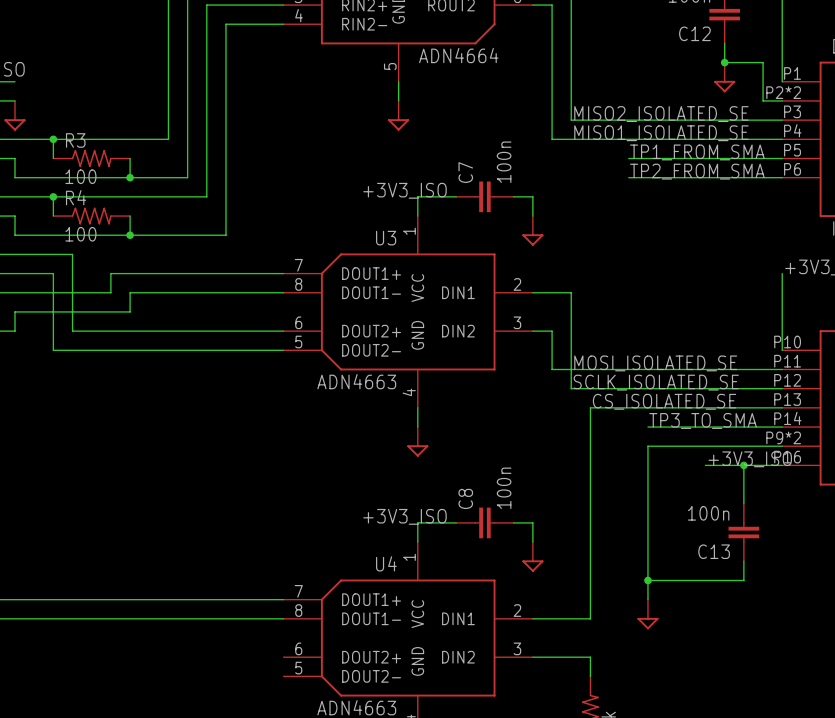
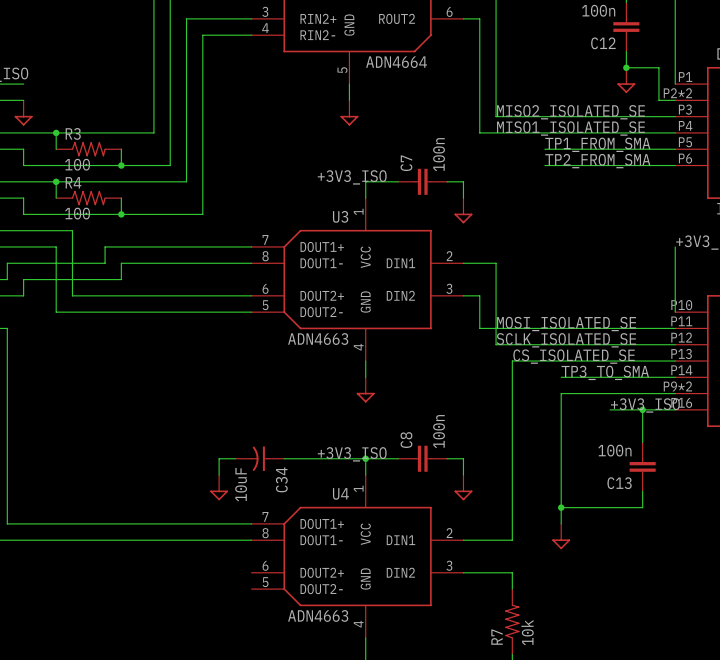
wire: none -> (235, 458) (219, 458) (219, 475)
C34: none -> 10uF (259, 458)
wire: none -> (284, 458) (365, 458)
junction: none -> (365, 458)
power symbol: none -> (219, 487)

